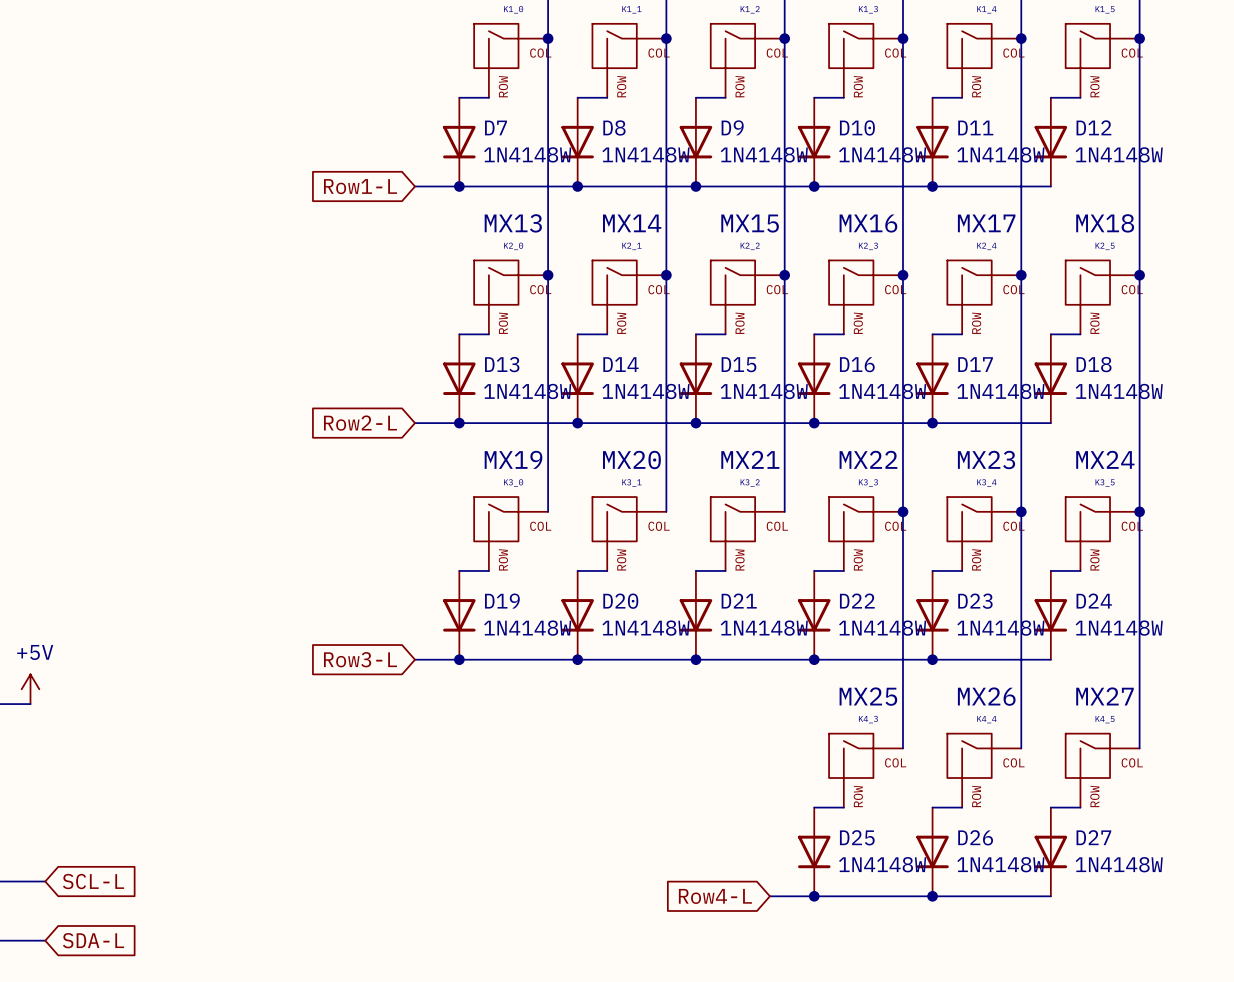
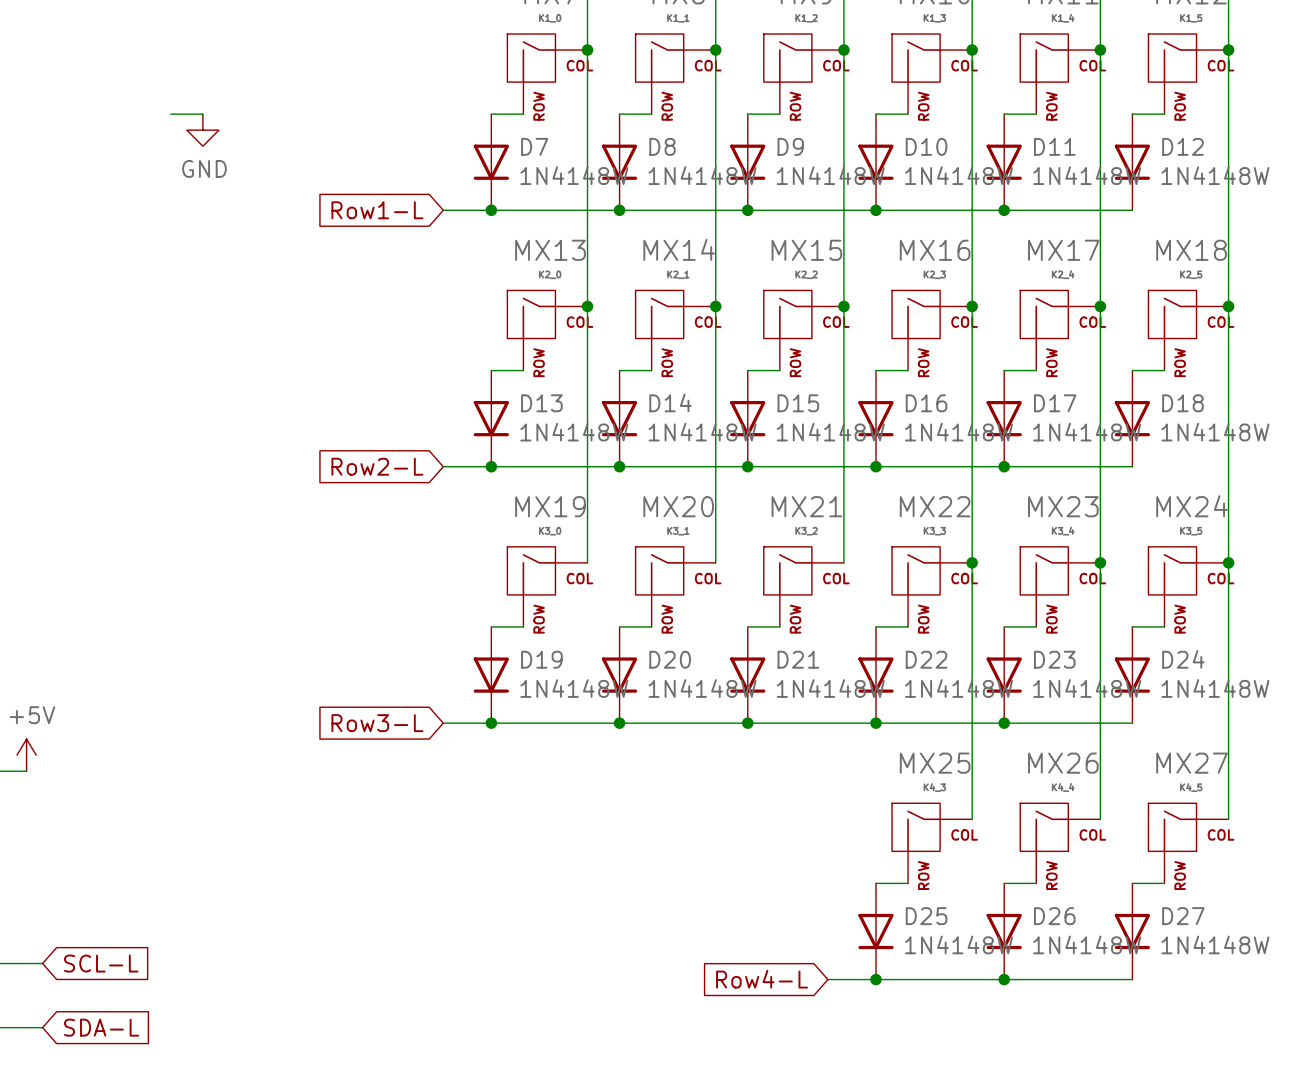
wire: none -> (170, 114) (202, 114)
power symbol: none -> GND (202, 130)

